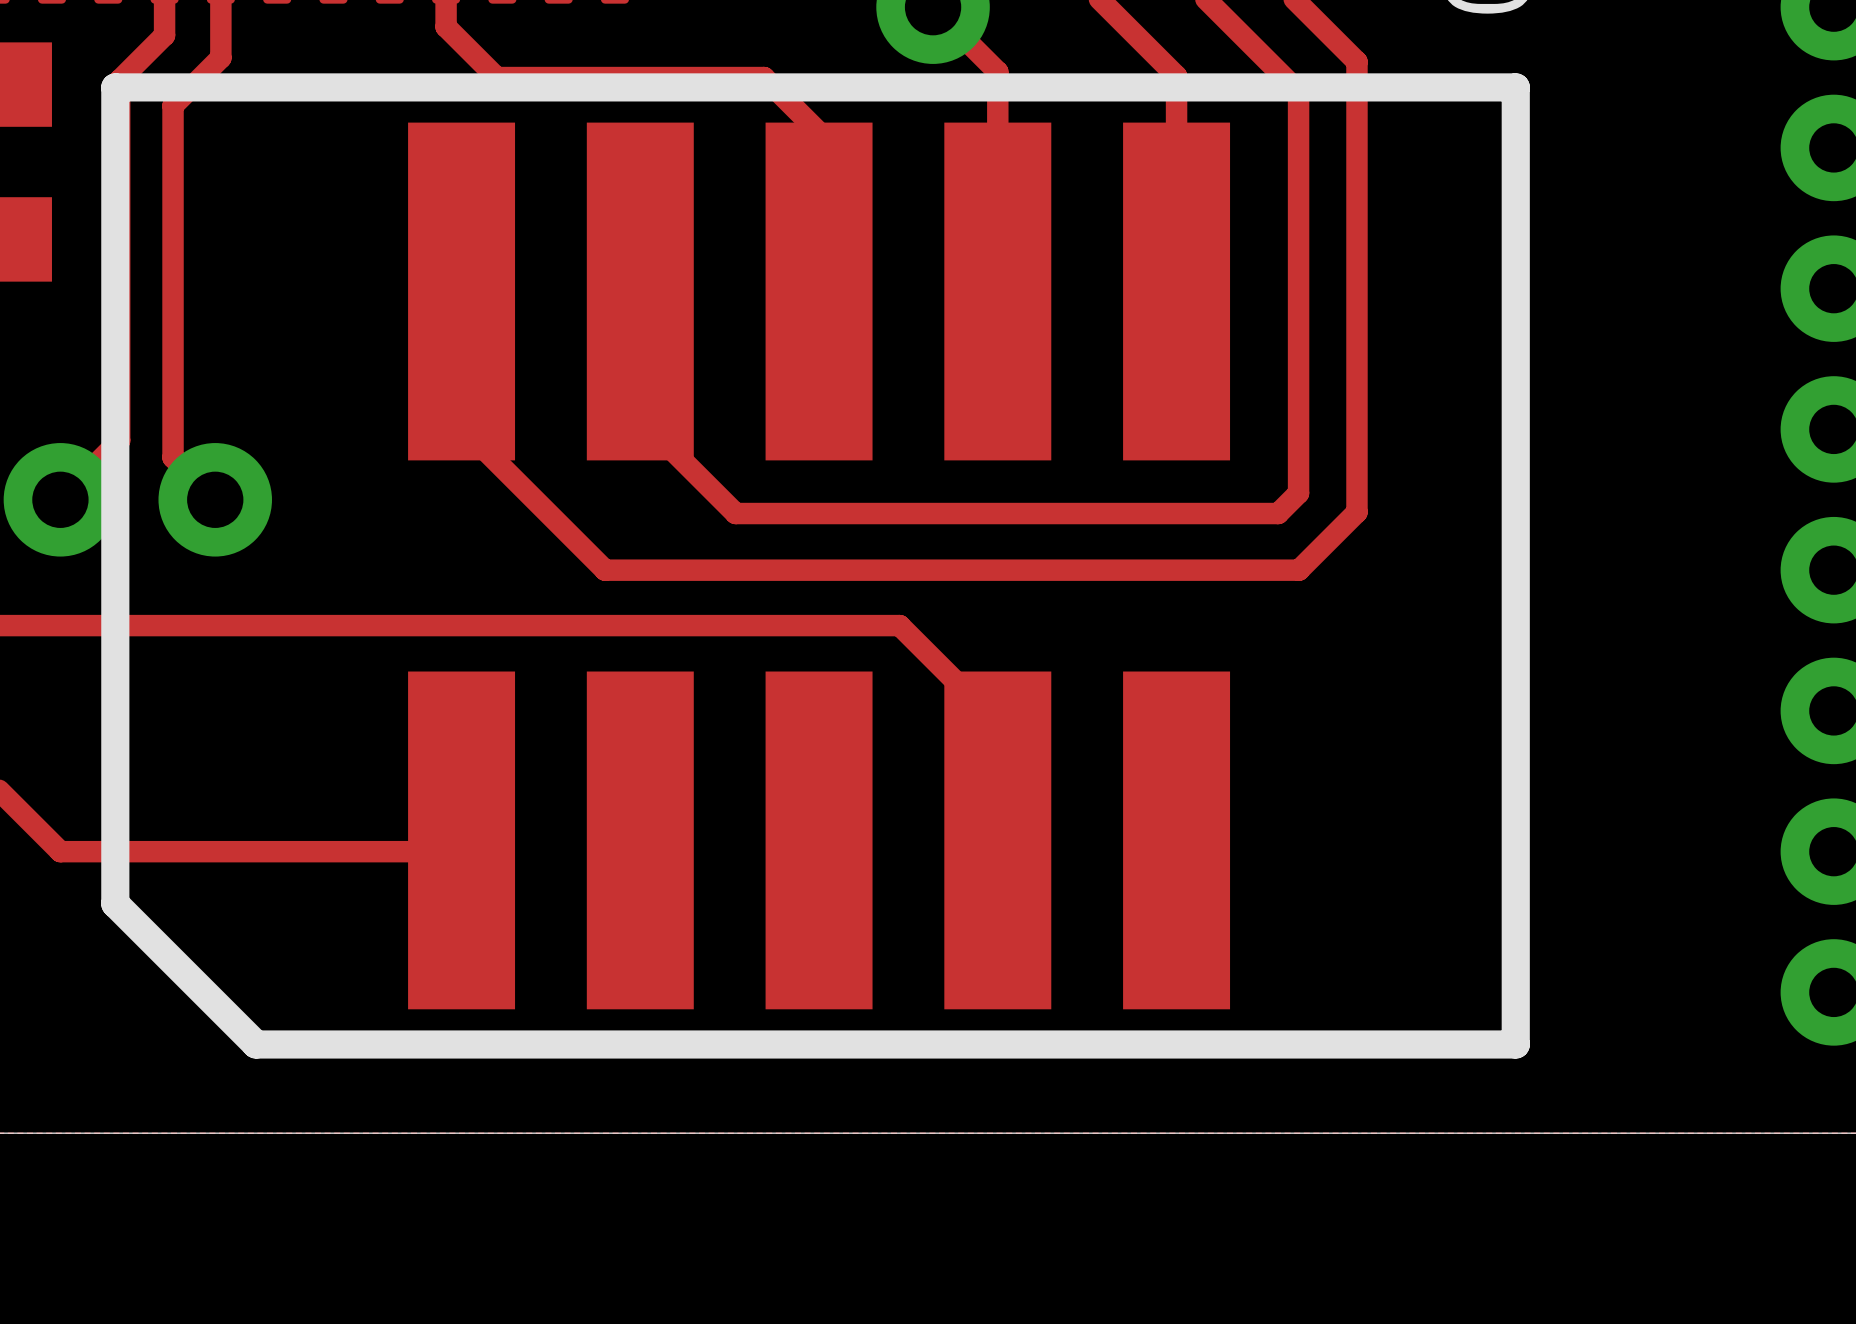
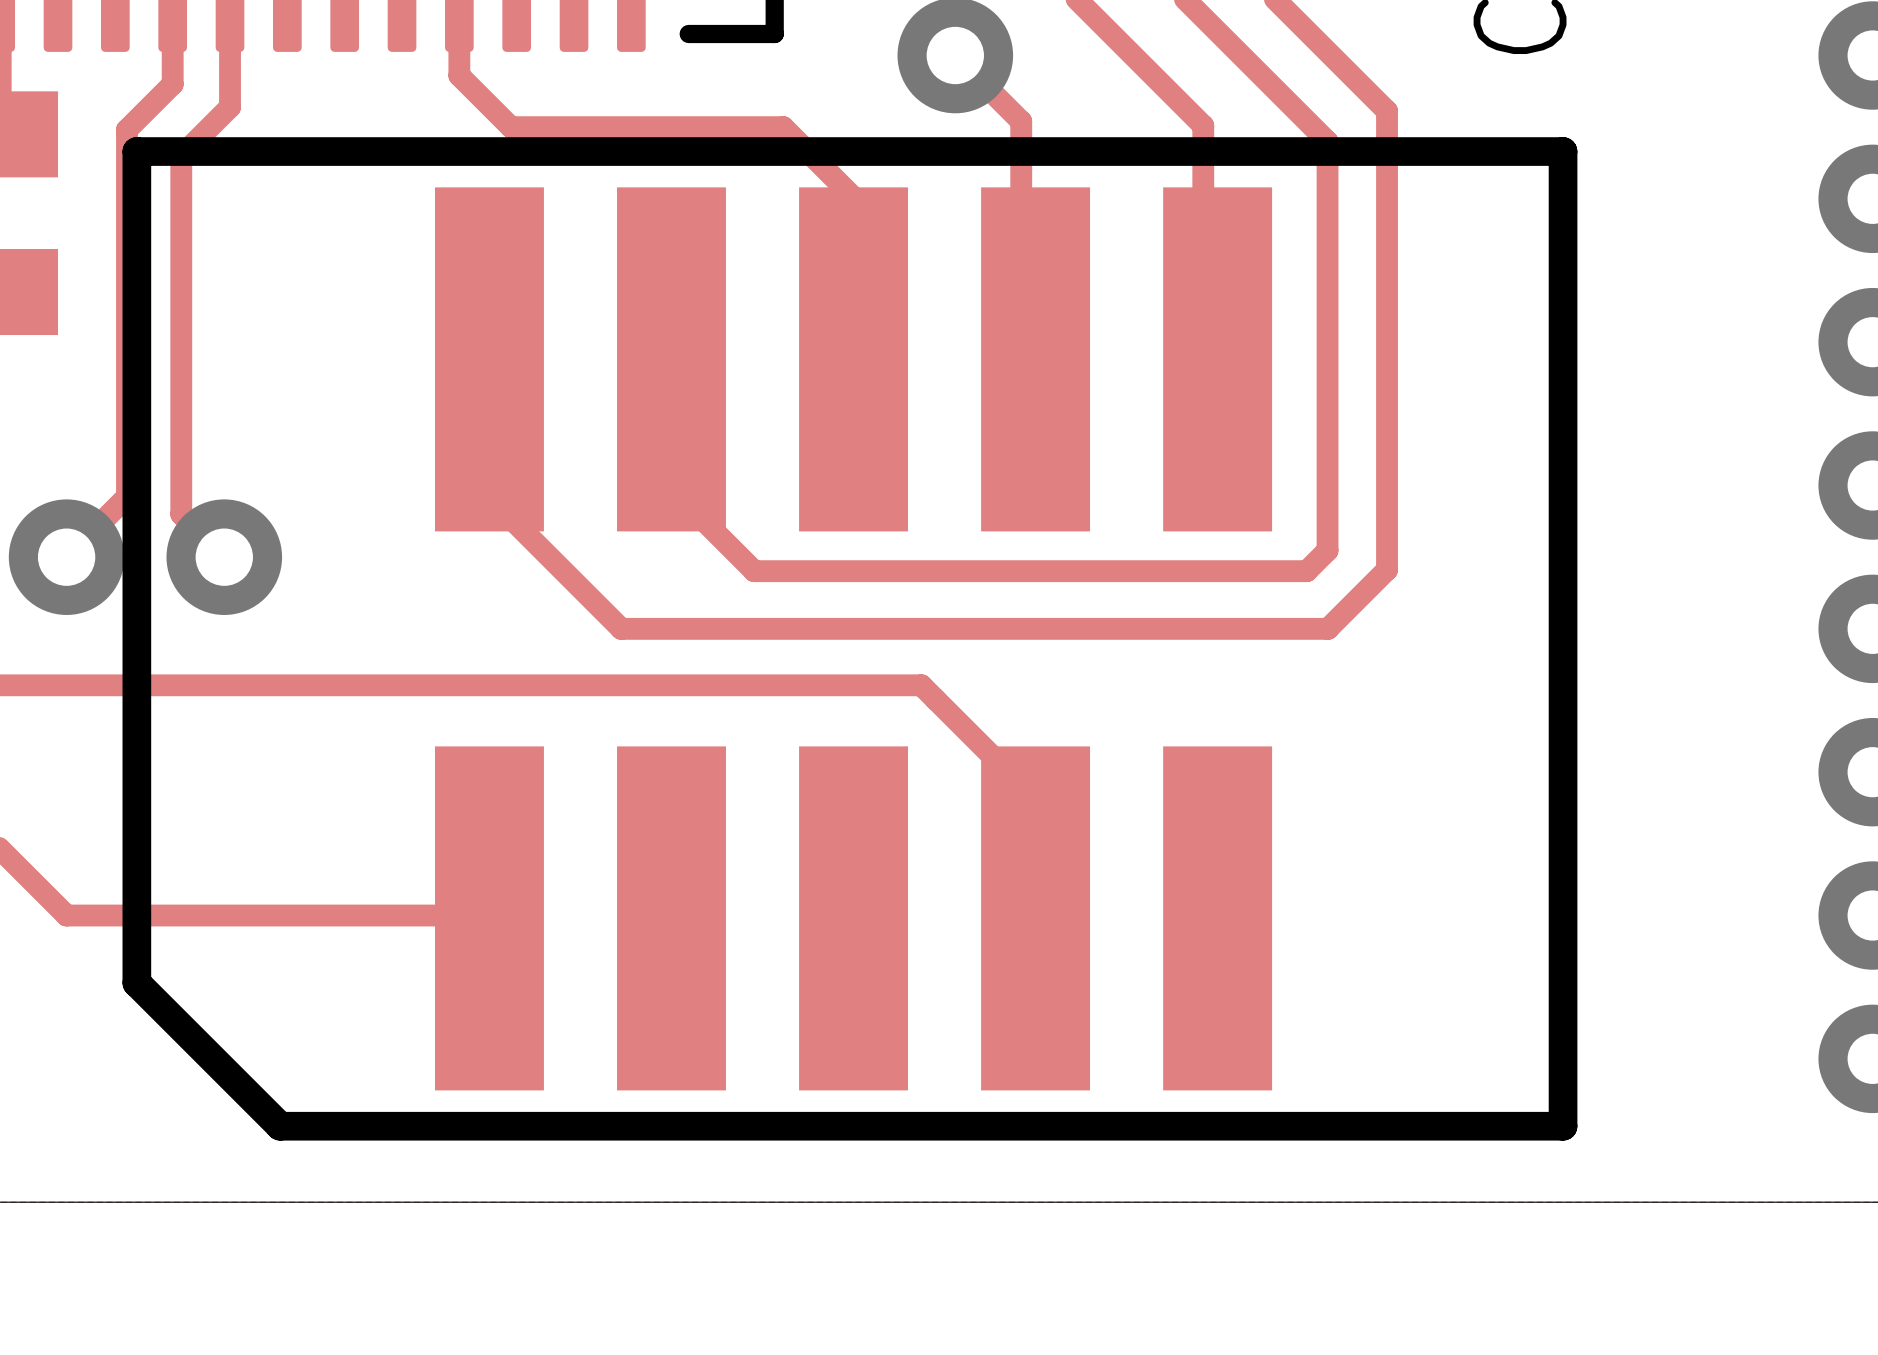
part position: (815, 565) -> (849, 638)

